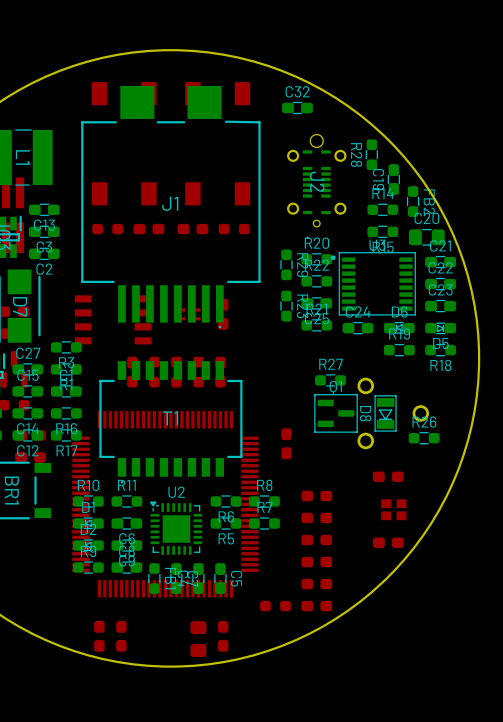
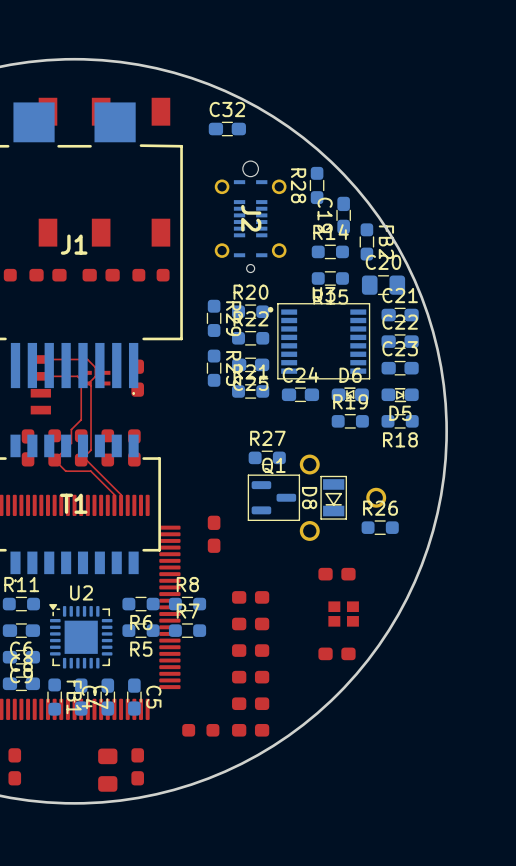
top track: none -> (40, 359) (87, 359) (95, 367) (95, 376) (88, 383) (91, 385) (91, 450) (81, 460) (86, 460) (121, 494) (121, 505)
top track: none -> (40, 376) (77, 376) (81, 380)
top track: none -> (81, 380) (81, 419) (71, 429) (71, 443) (54, 460) (65, 471) (90, 471) (114, 494) (114, 505)

